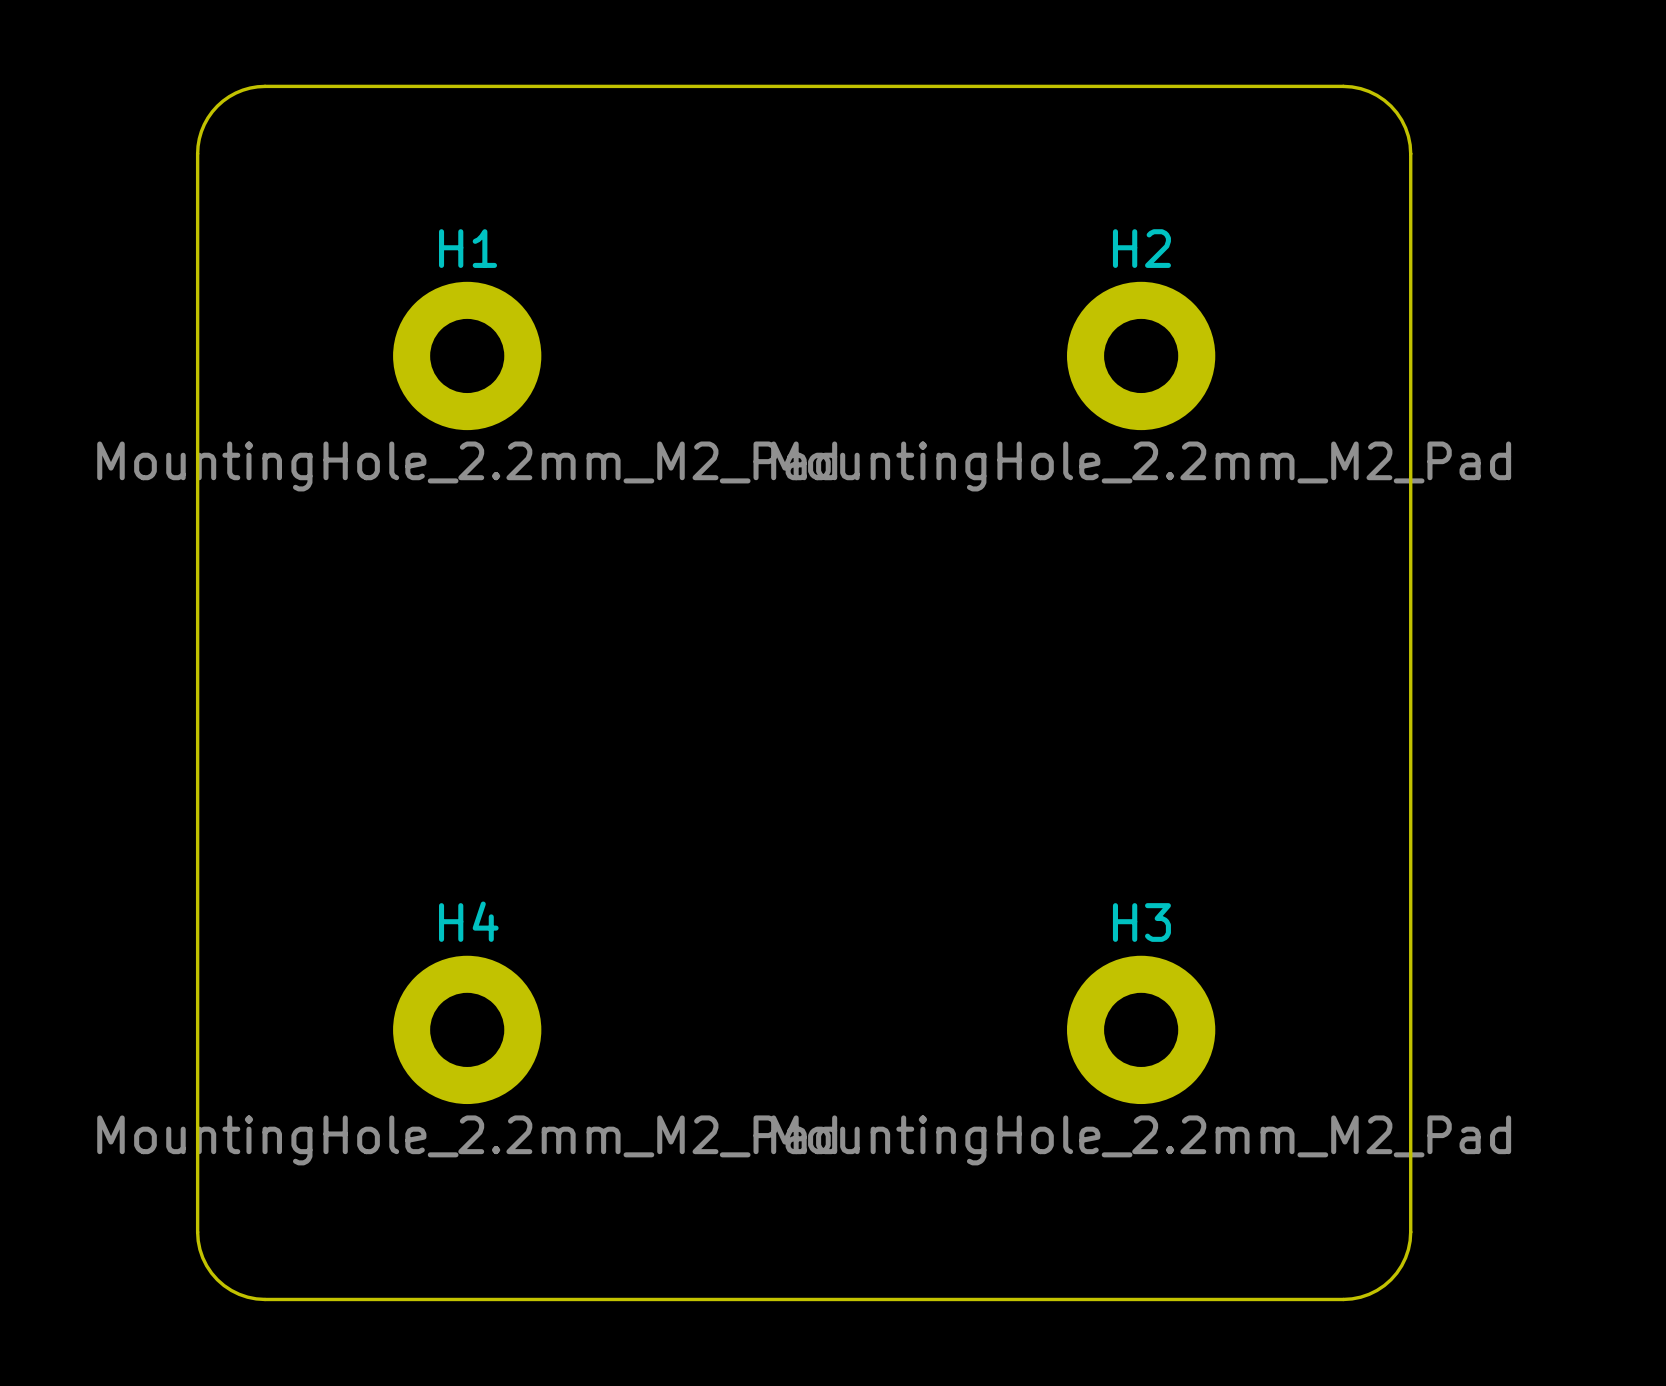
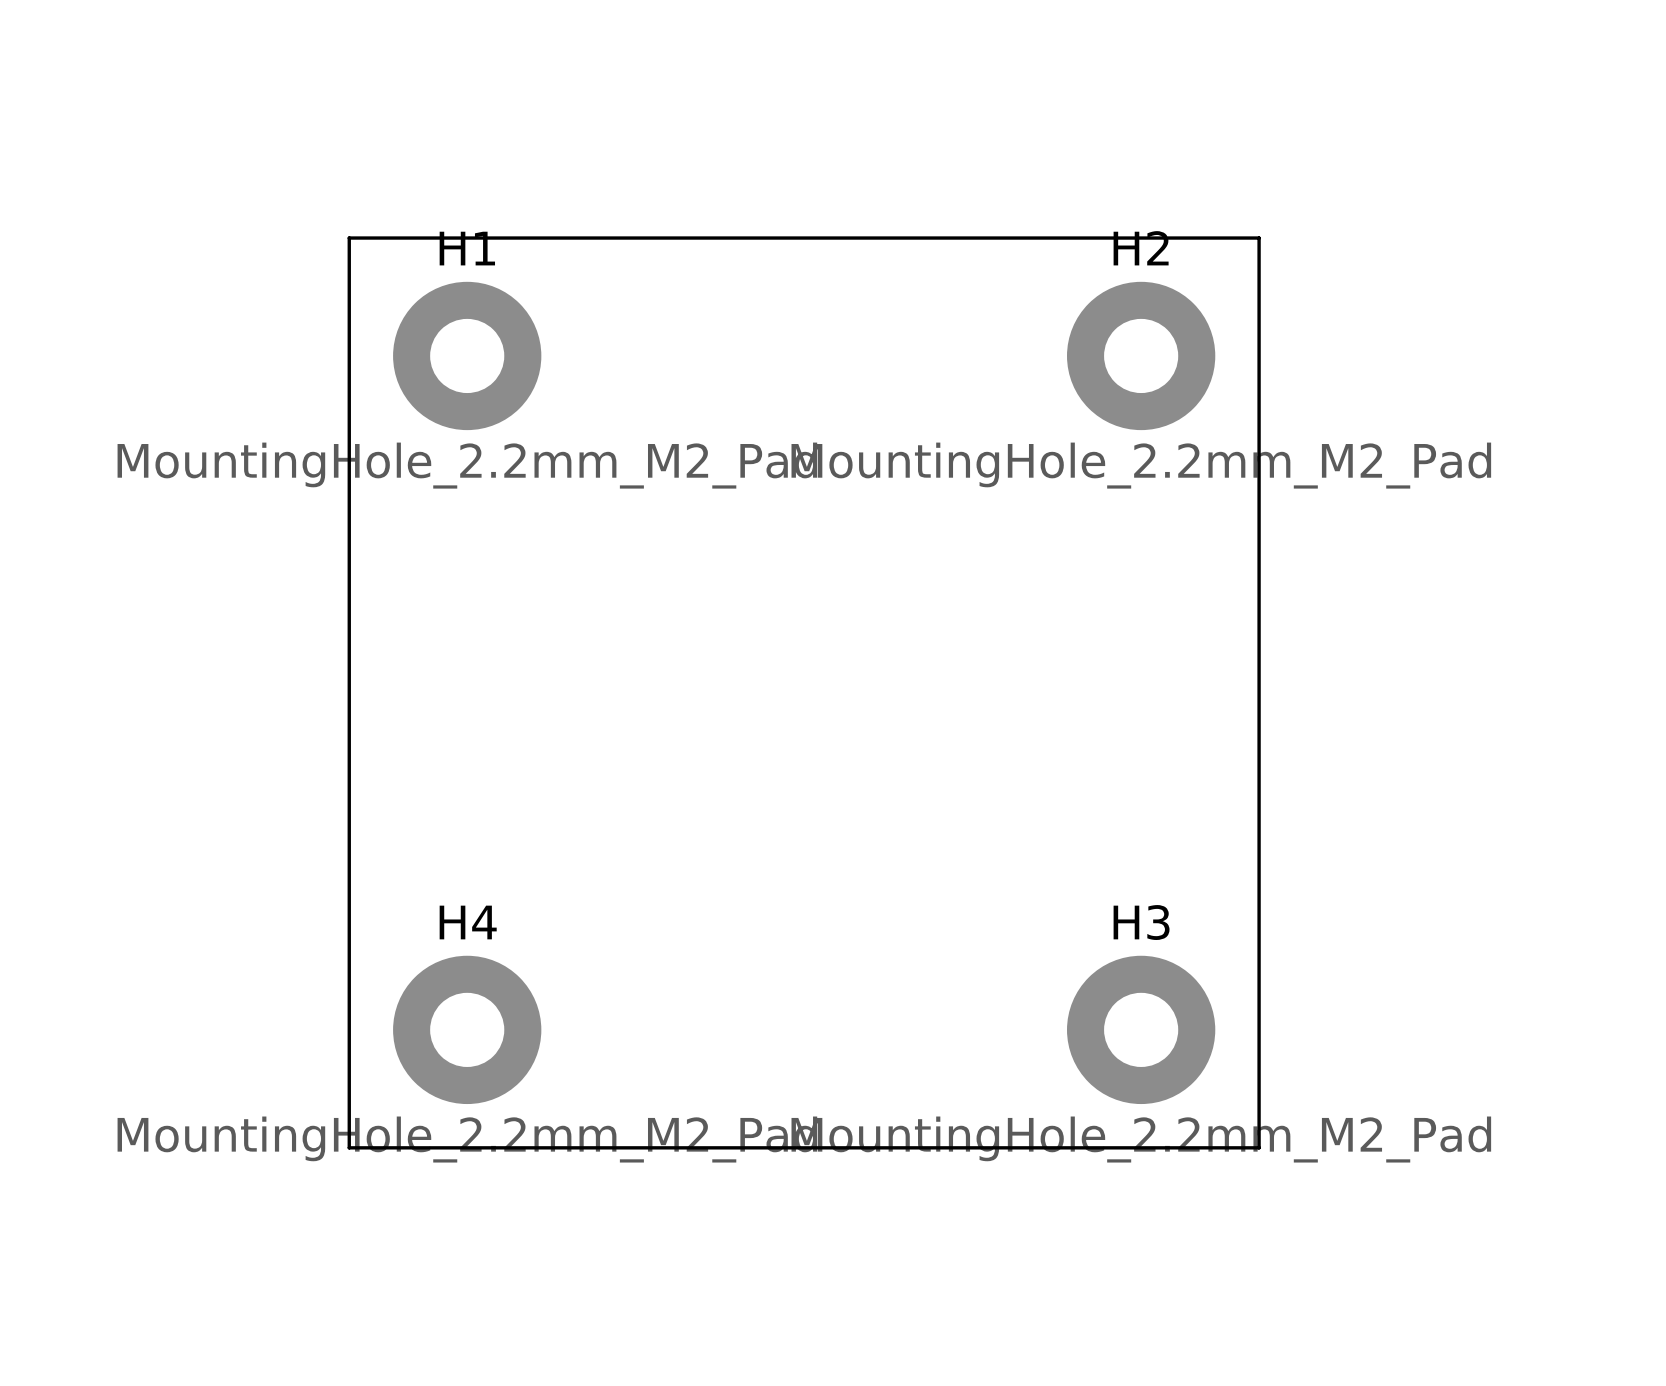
board edge: (265, 86) (1343, 86) (1369, 91) (1390, 106) (1405, 127) (1410, 153) (1410, 1232) (1405, 1257) (1390, 1279) (1369, 1294) (1343, 1299) (265, 1299) (239, 1294) (217, 1279) (202, 1257) (197, 1232) (197, 153) (199, 138) (204, 124) (217, 106) (229, 96) (242, 90) (265, 86) -> (349, 238) (349, 1147) (1259, 1147) (1259, 238) (349, 238)

